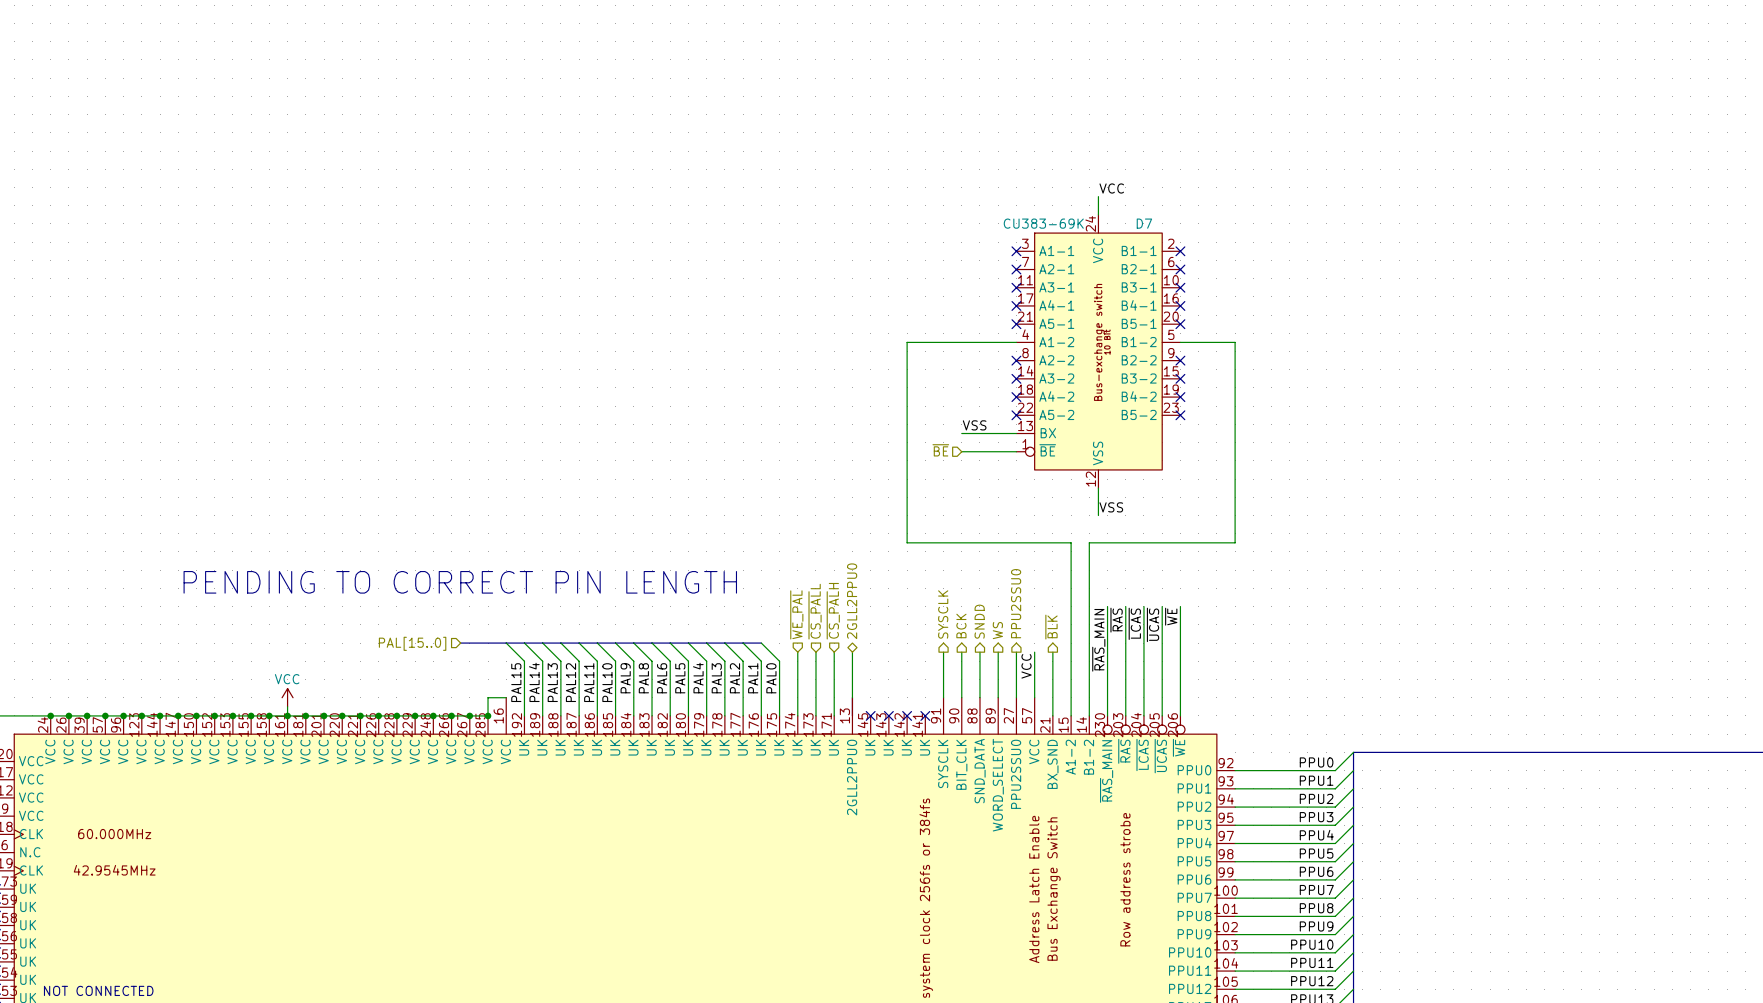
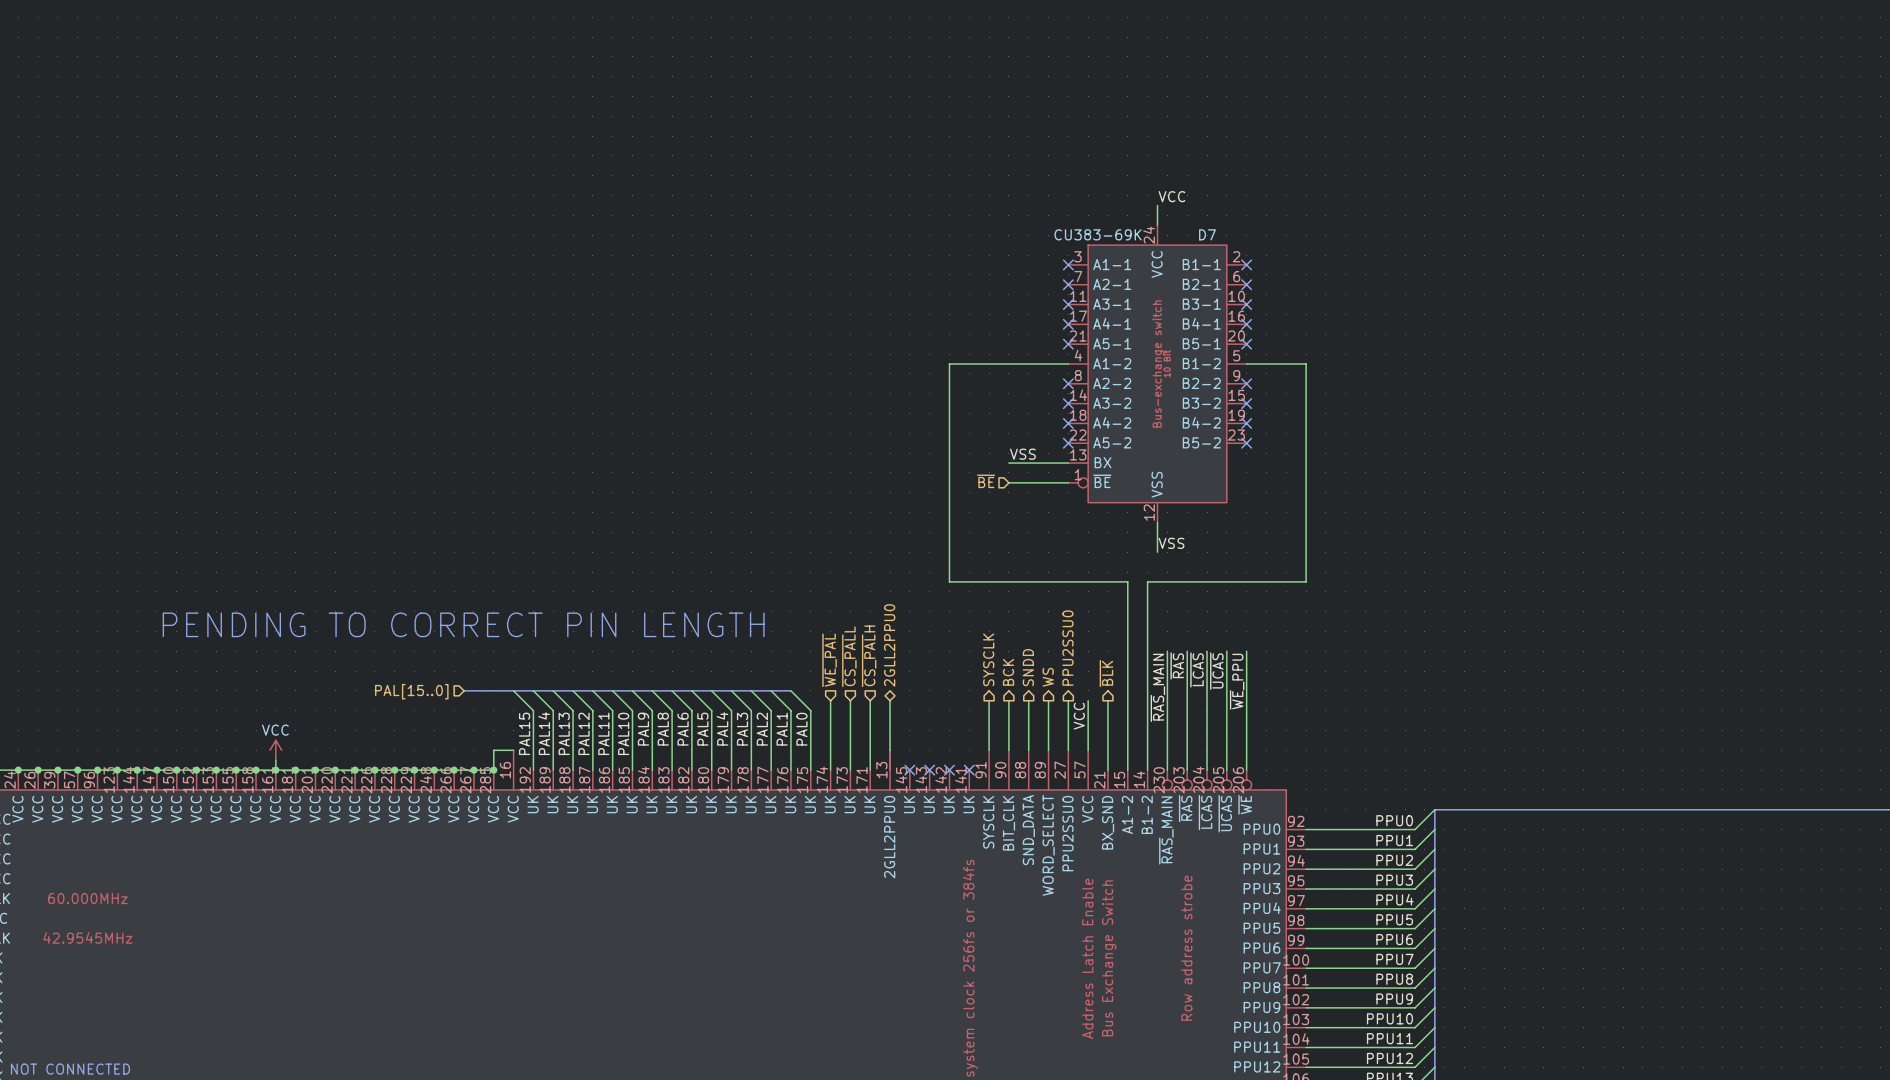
label: ~{WE} (1171, 616) -> ~{WE}_PPU (1237, 681)

